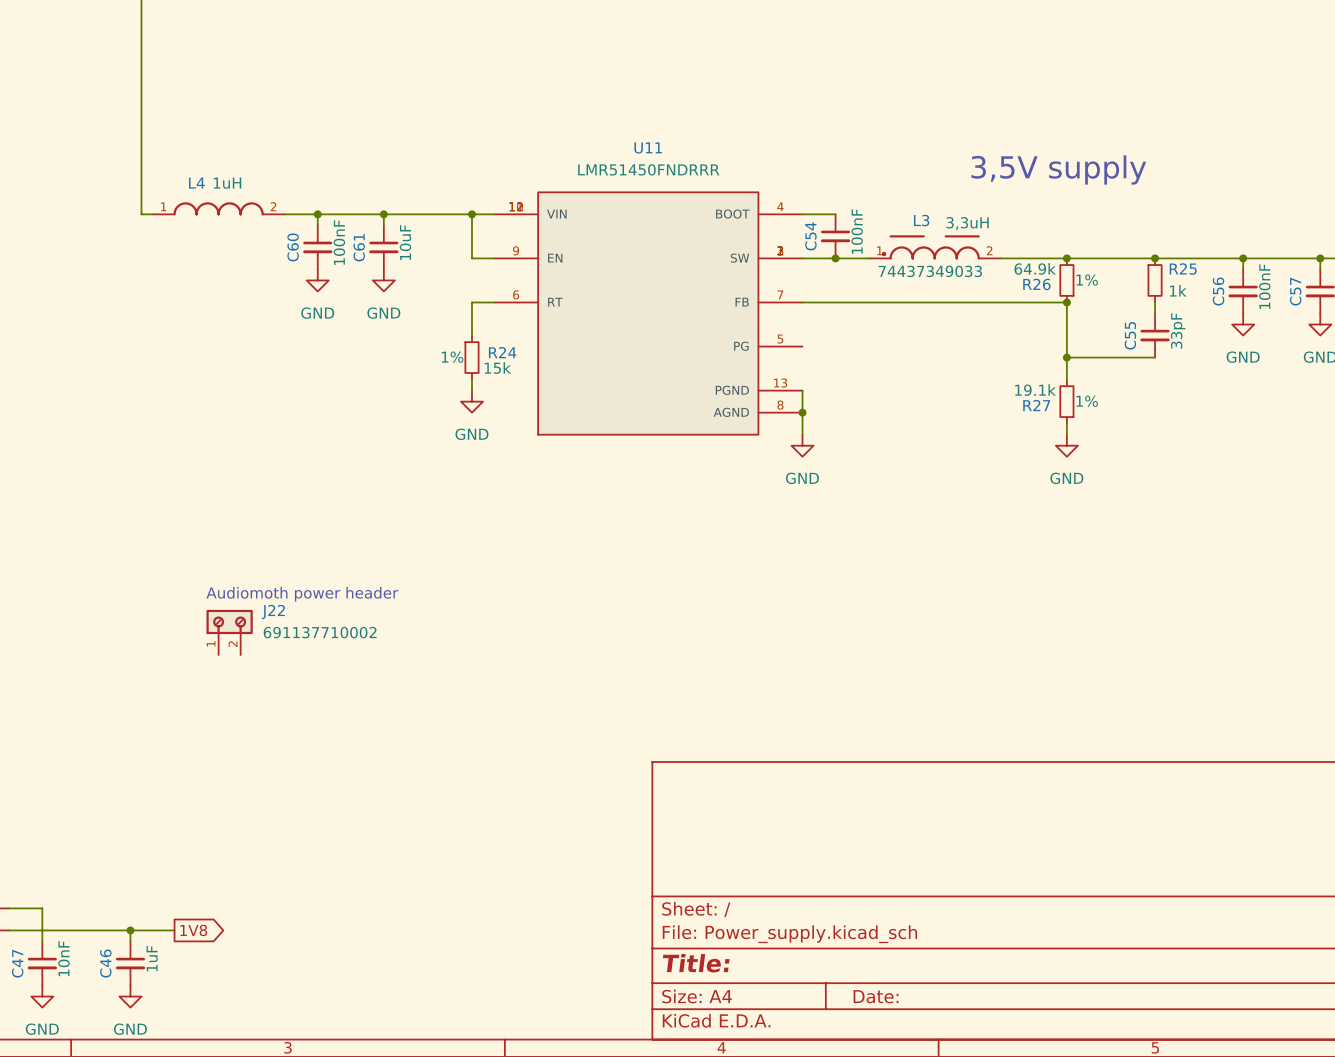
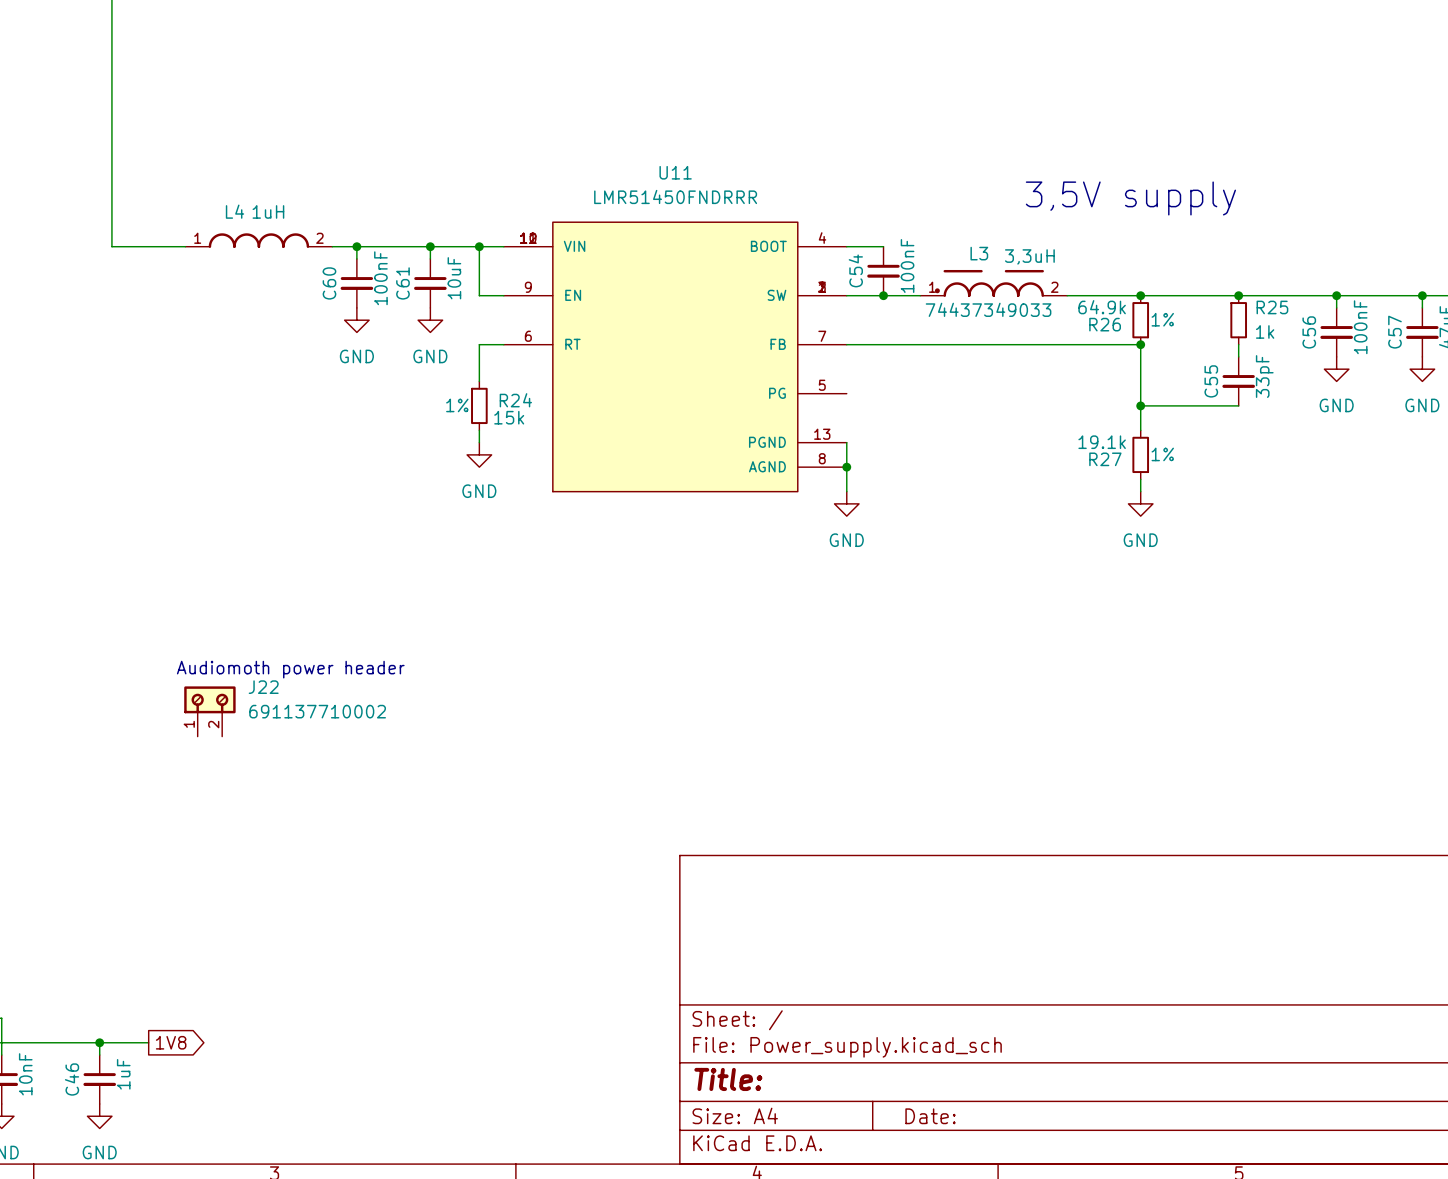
L4 position: (218, 208) -> (258, 240)
wire: (284, 214) (339, 214) -> (124, 246) (185, 246)
wire: (317, 214) (317, 225) -> (356, 246) (356, 258)
junction: (317, 214) -> none
junction: none -> (356, 246)
wire: (383, 214) (383, 225) -> (430, 246) (430, 258)
junction: (383, 214) -> none
junction: none -> (430, 246)
C60 position: (317, 247) -> (356, 283)
C61 position: (383, 247) -> (430, 283)
power symbol: GND (317, 280) -> none
power symbol: none -> GND (356, 320)
power symbol: GND (383, 280) -> none
power symbol: none -> GND (430, 320)

